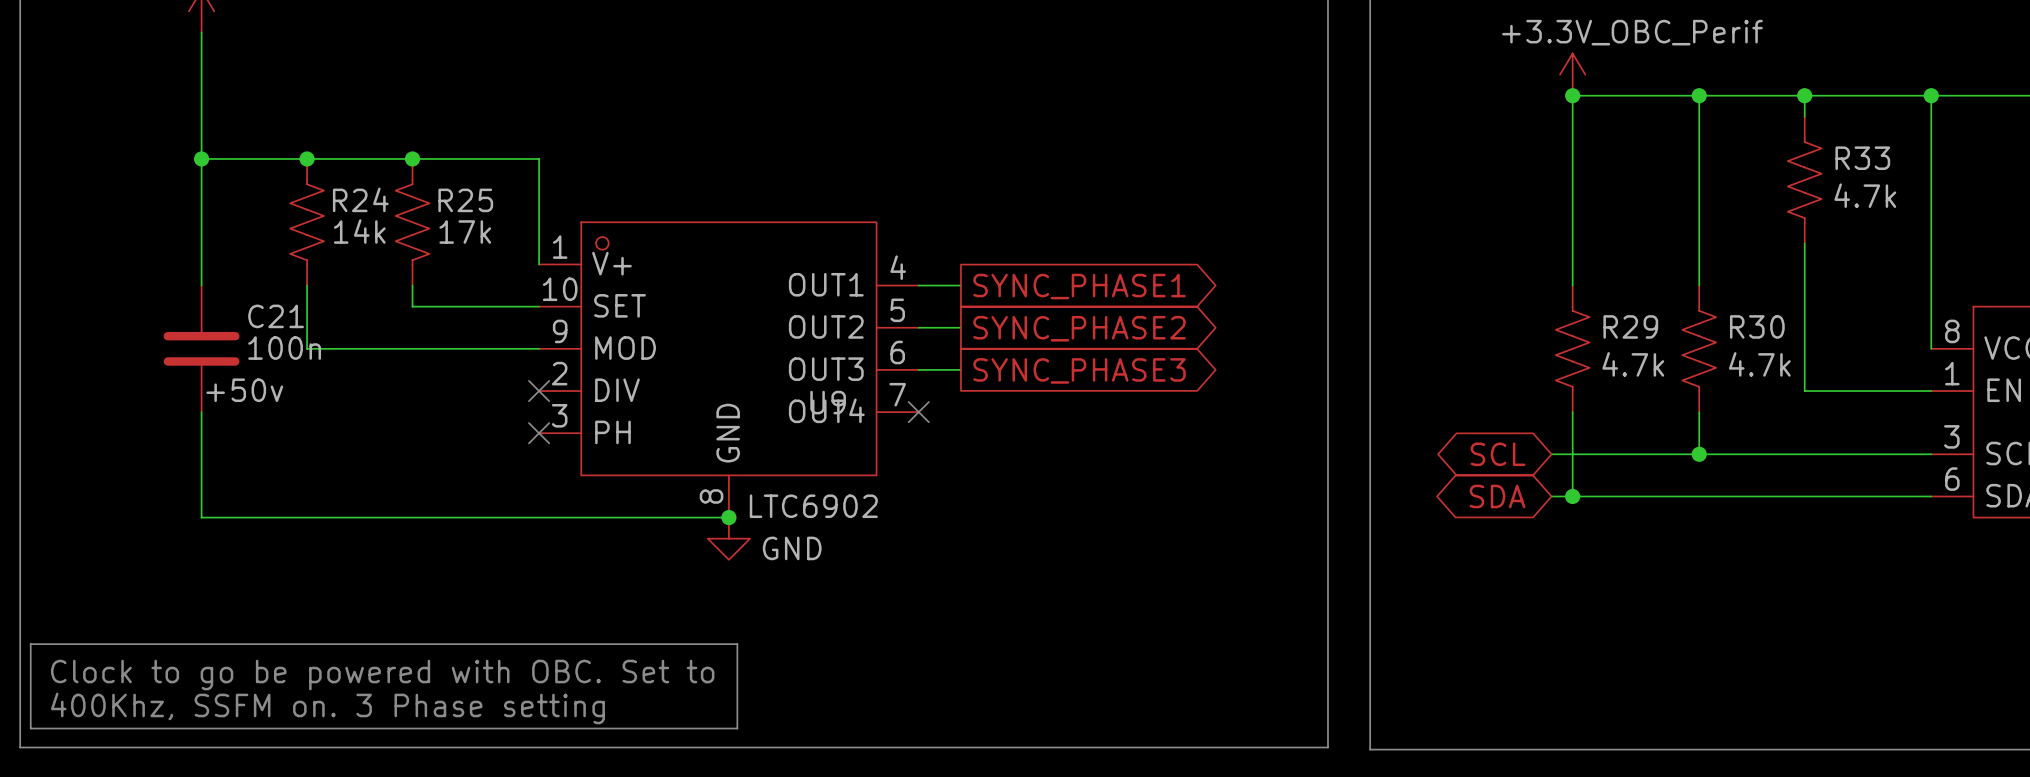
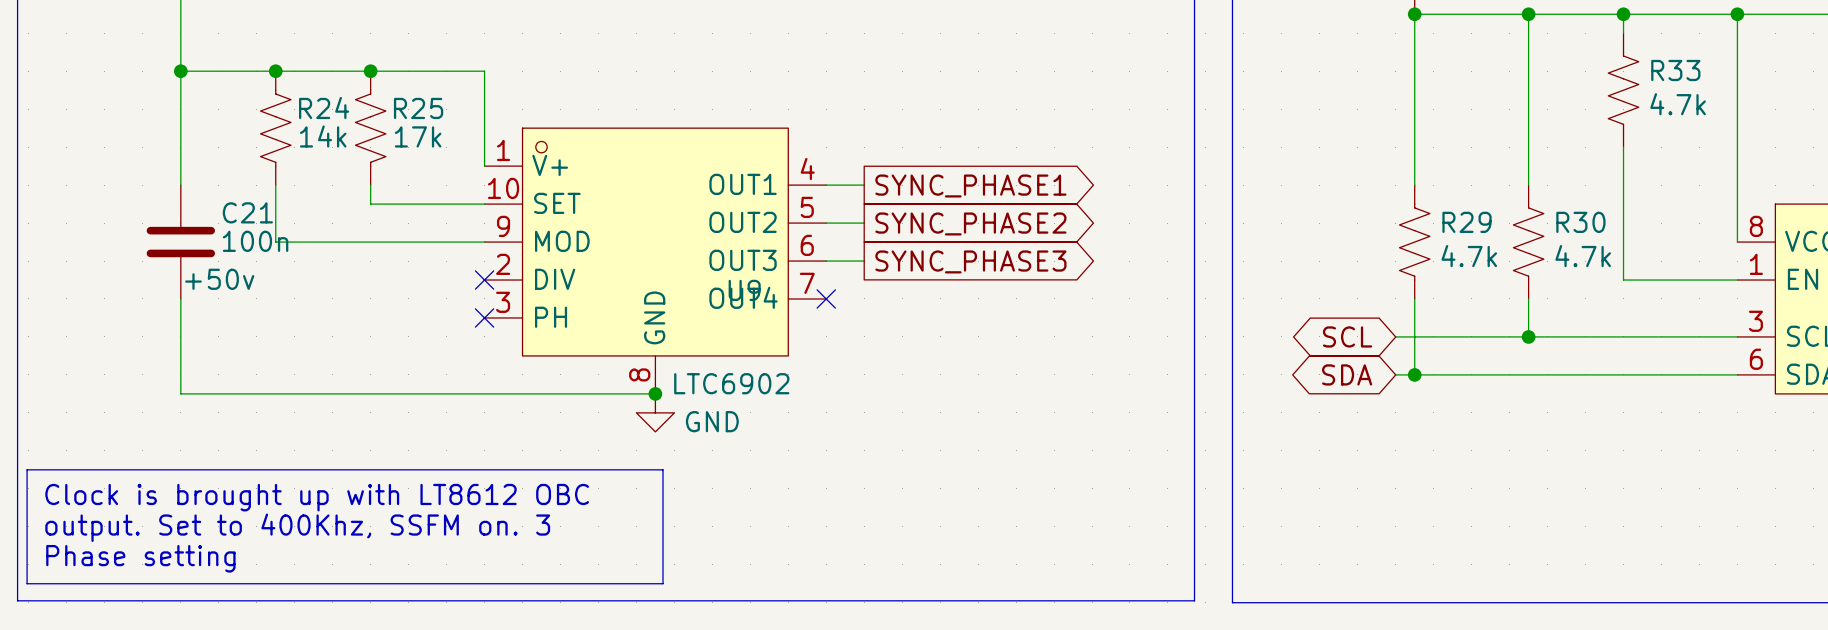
text: none -> Clock is brought up with LT8612 OBC (317, 497)
line: (30, 644) (737, 644) -> (27, 507) (27, 469) (662, 469) (662, 507)
text: Clock to go be powered with OBC. Set to (382, 675) -> output. Set to 400Khz, SSFM on. 3 (297, 527)
text: 400Khz, SSFM on. 3 Phase setting (327, 708) -> Phase setting (140, 558)

